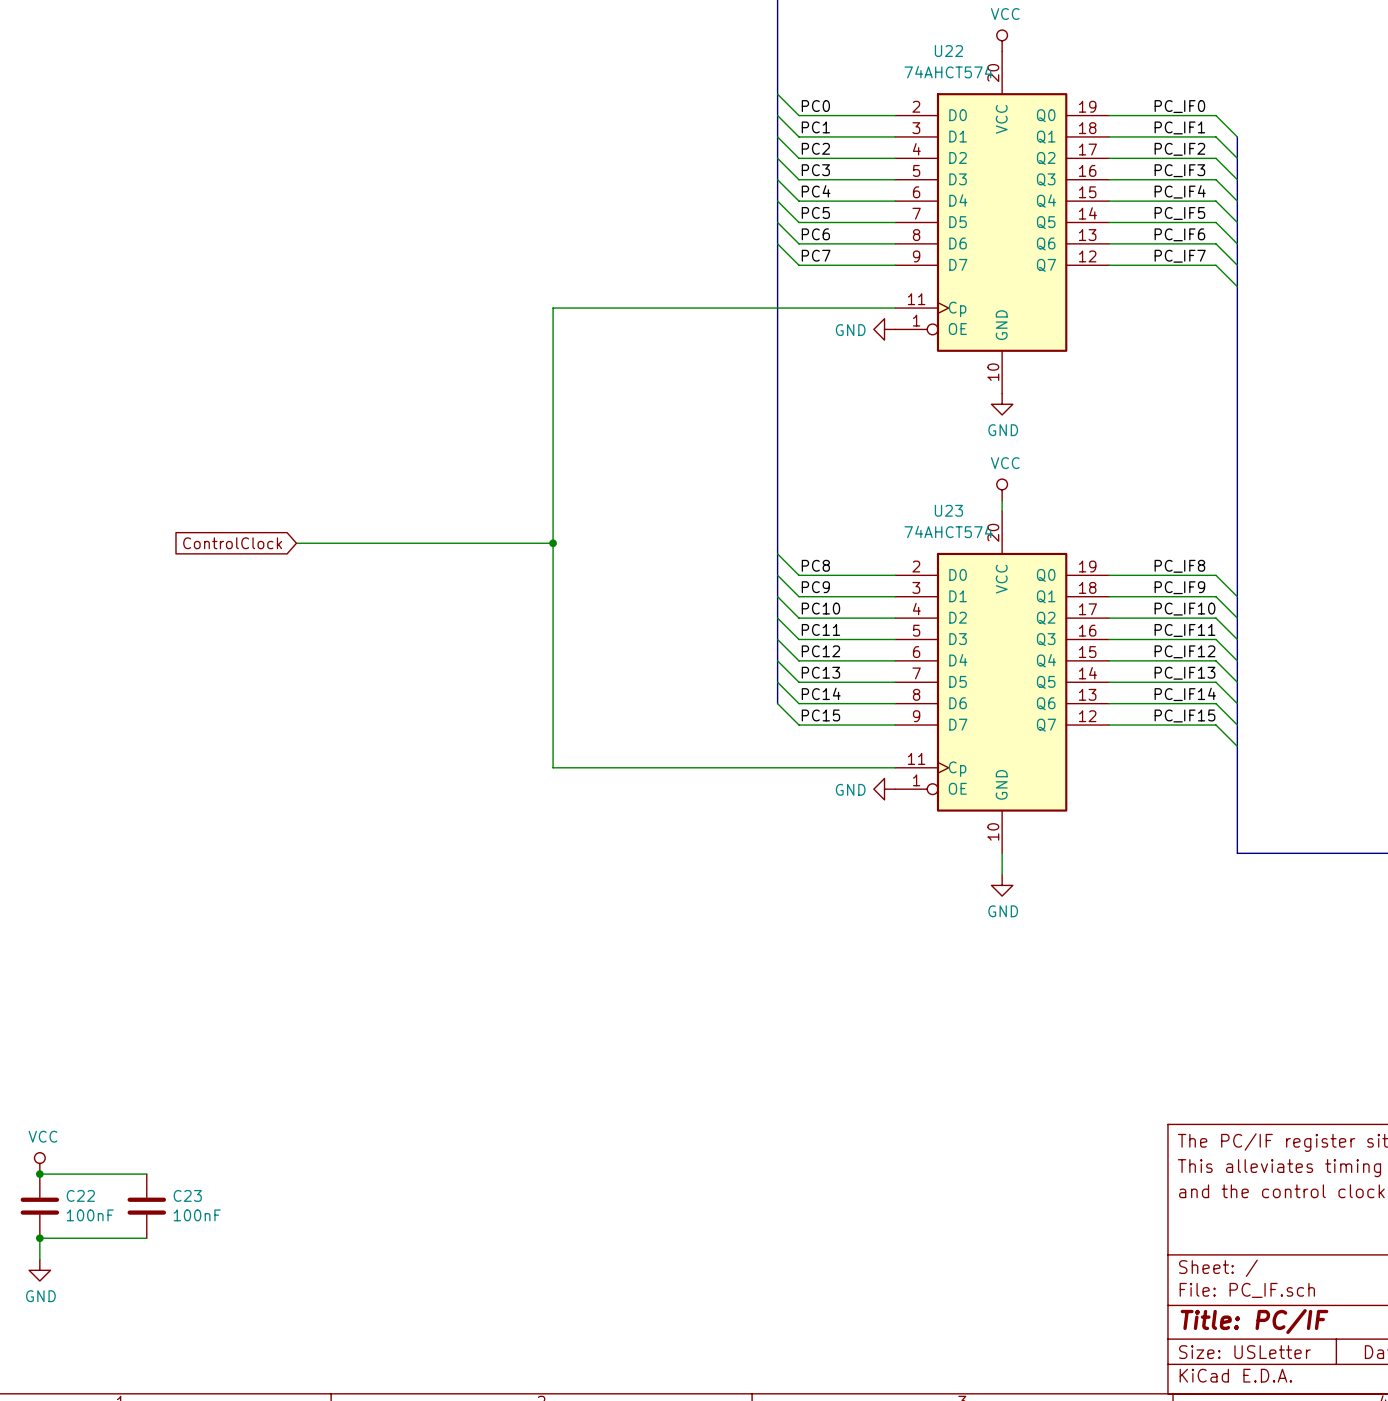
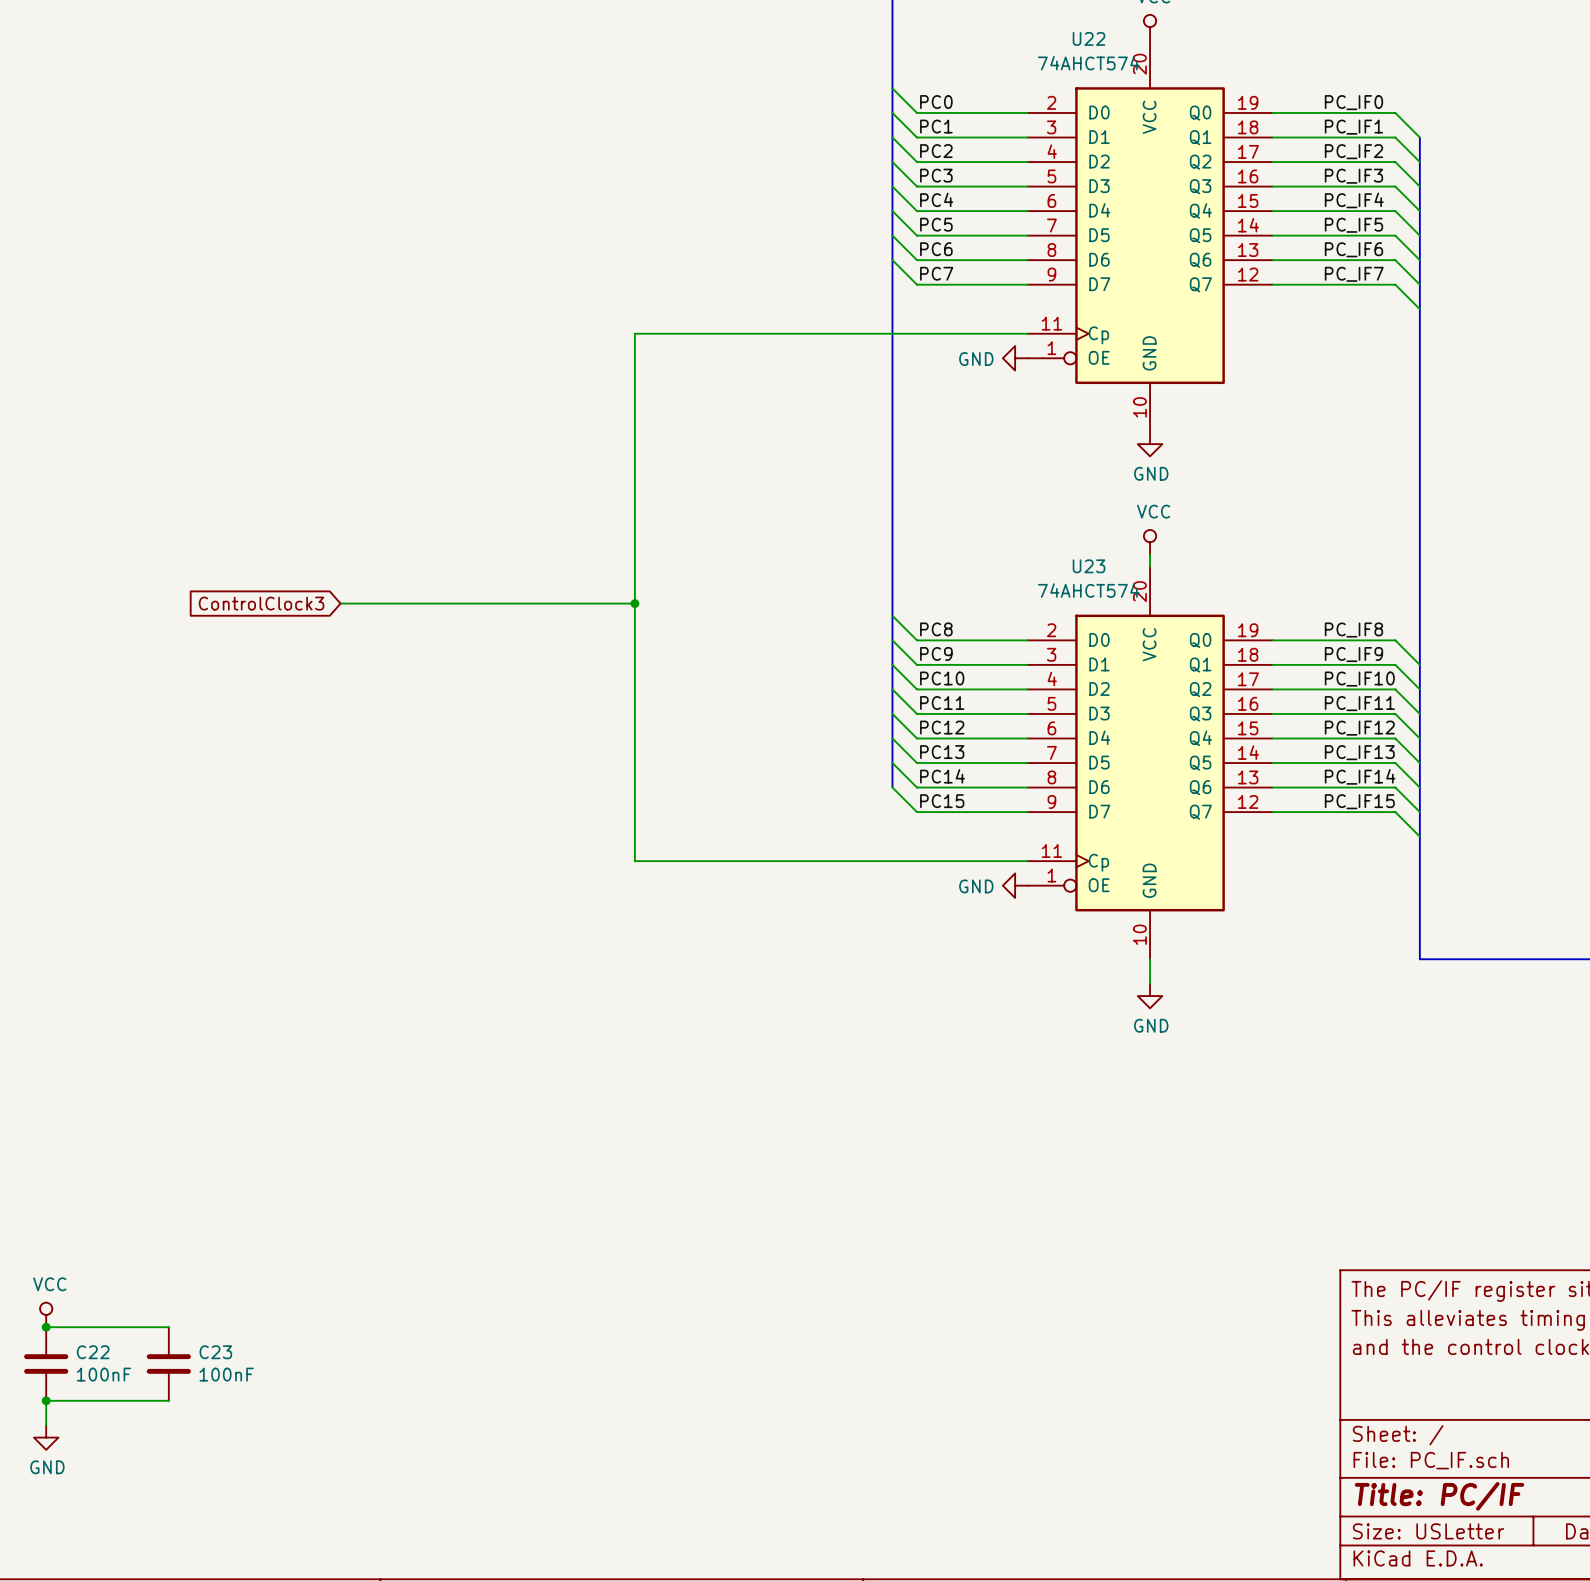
global label: ControlClock (232, 543) -> ControlClock3 (261, 603)

